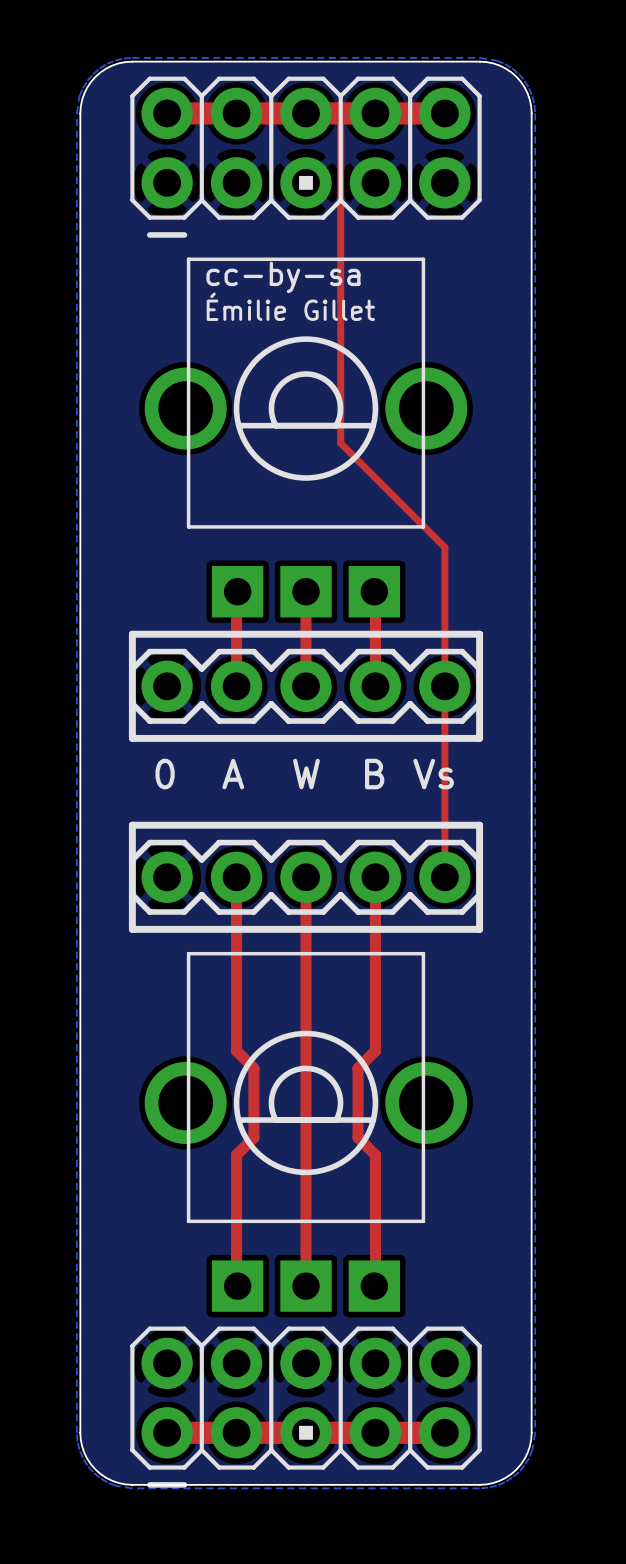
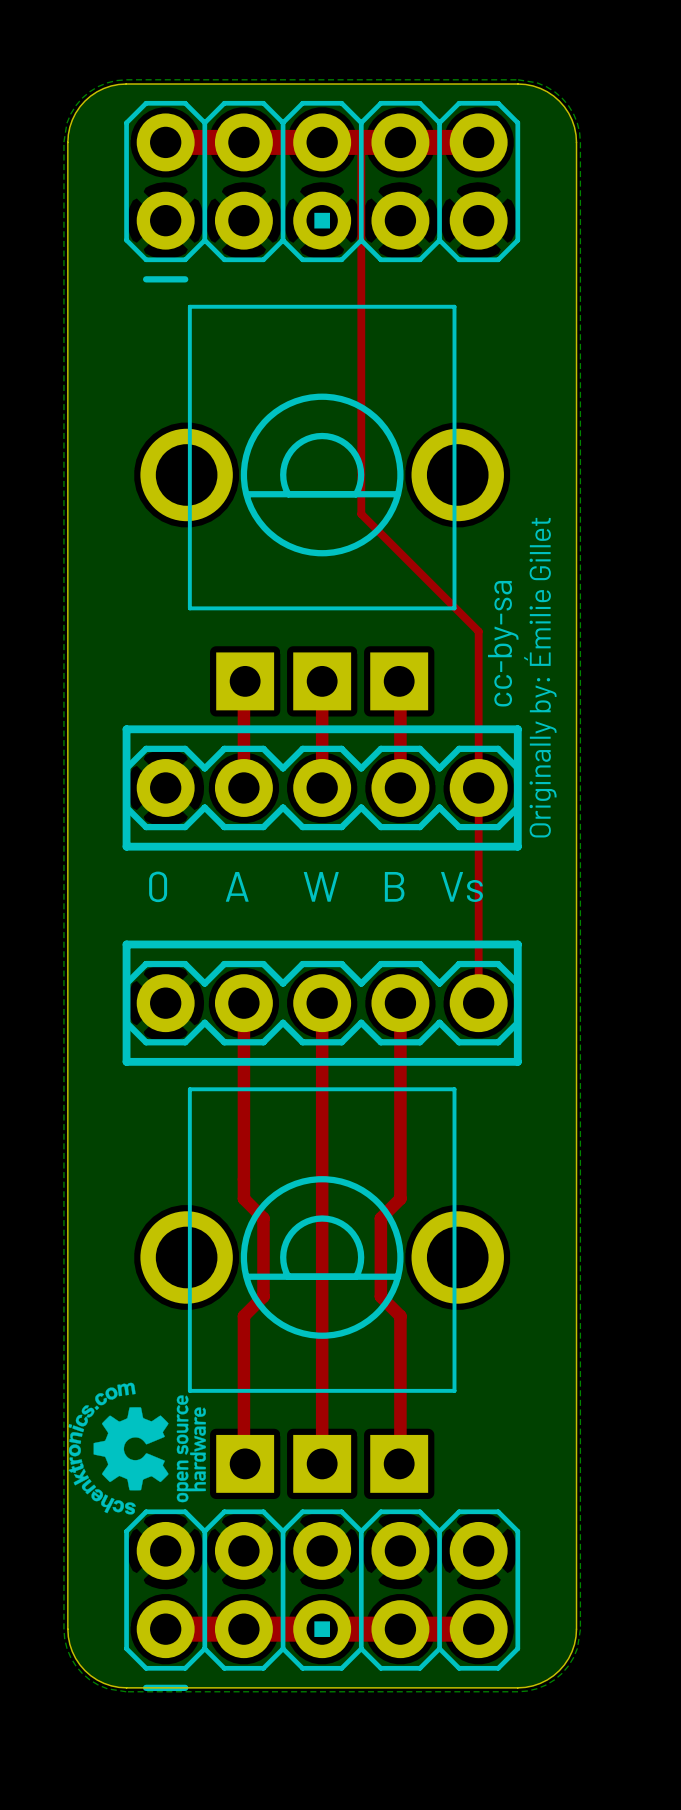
text rotation: 0° (283, 277) -> 90° counterclockwise (503, 643)
text position: cc-by-sa (283, 277) -> cc-by-sa (503, 643)
text: Émilie Gillet (290, 306) -> none
text: none -> Originally by: Émilie Gillet (540, 677)
drawing: none -> [68, 1382, 207, 1515]

